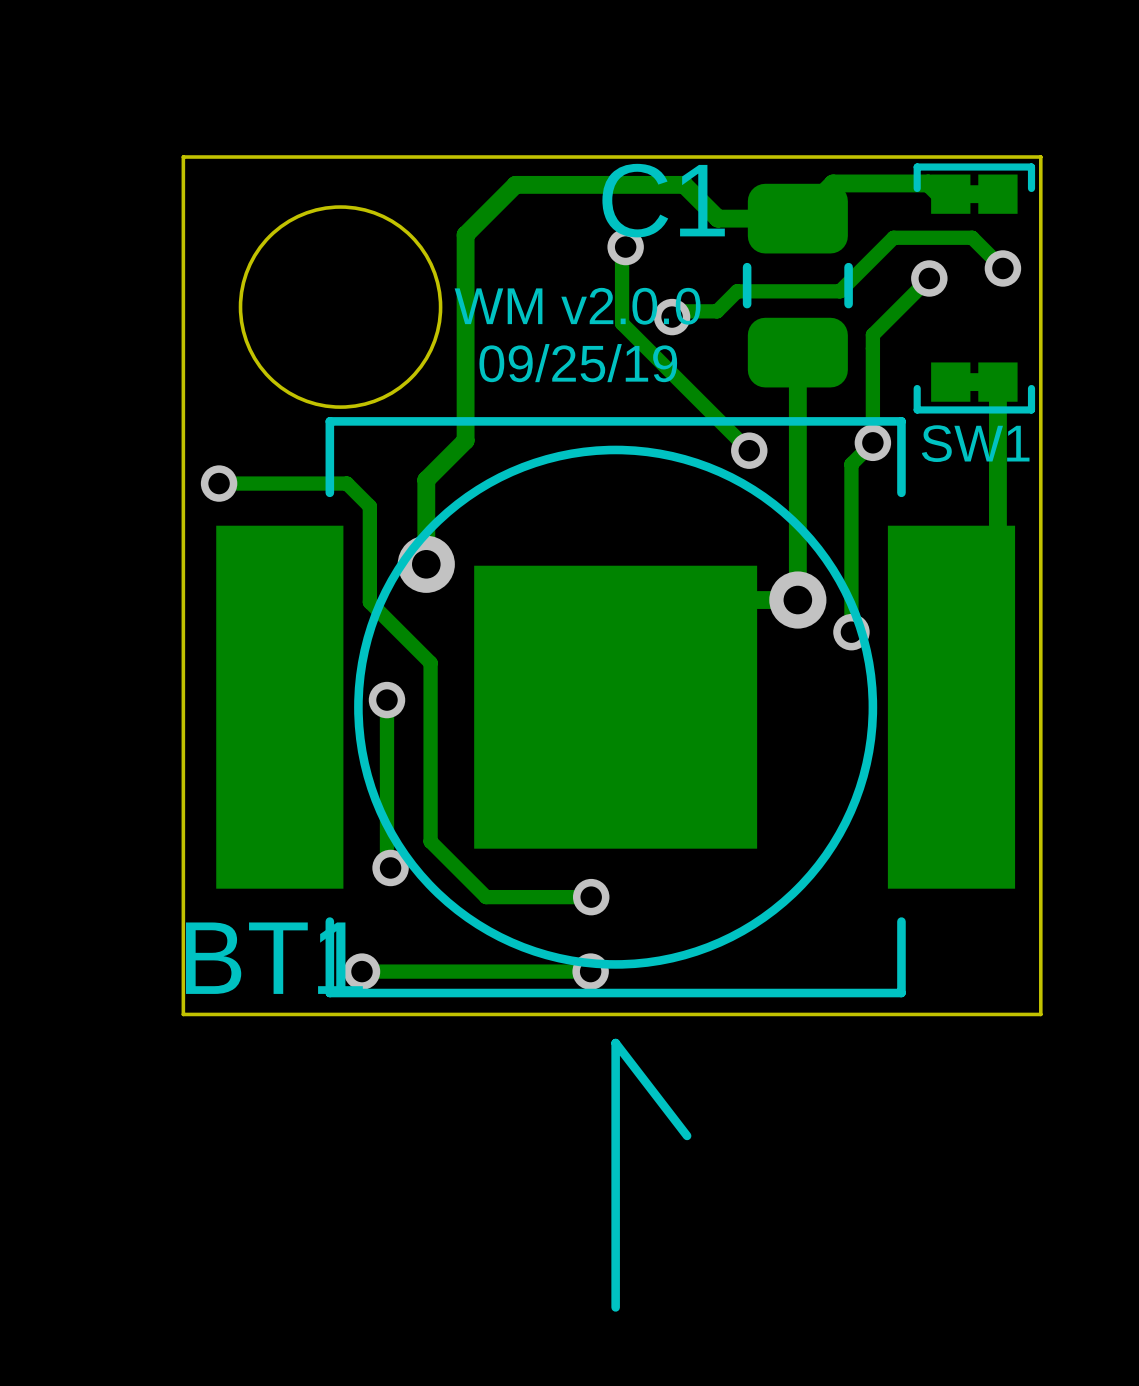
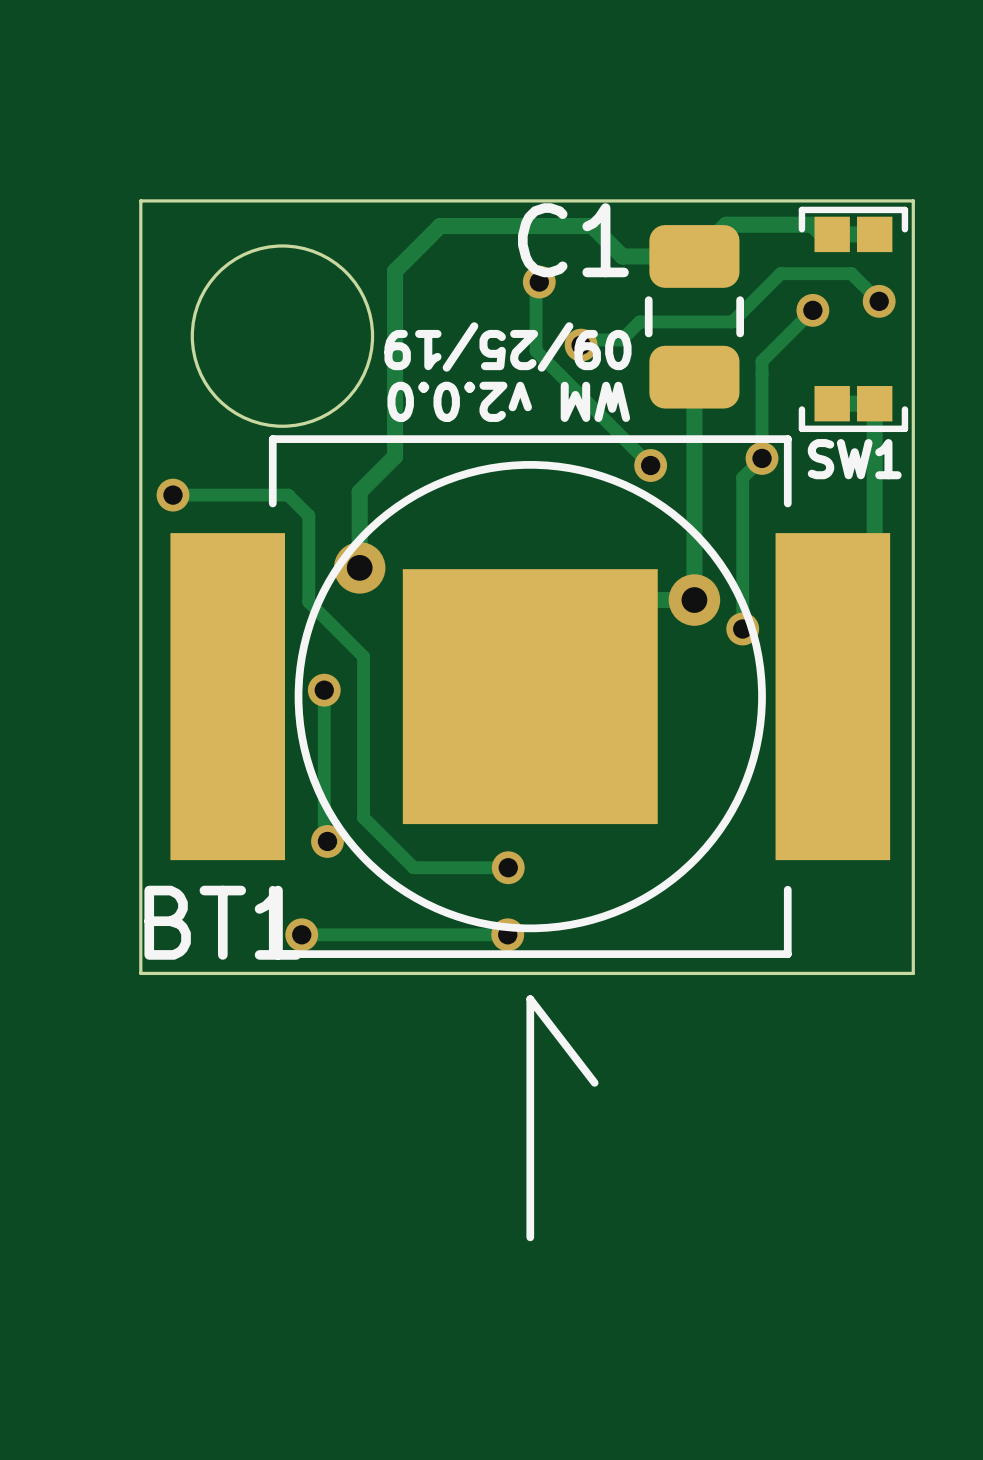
text rotation: 0° (577, 306) -> 180° (508, 401)
text rotation: 0° (578, 363) -> 180° (508, 346)

